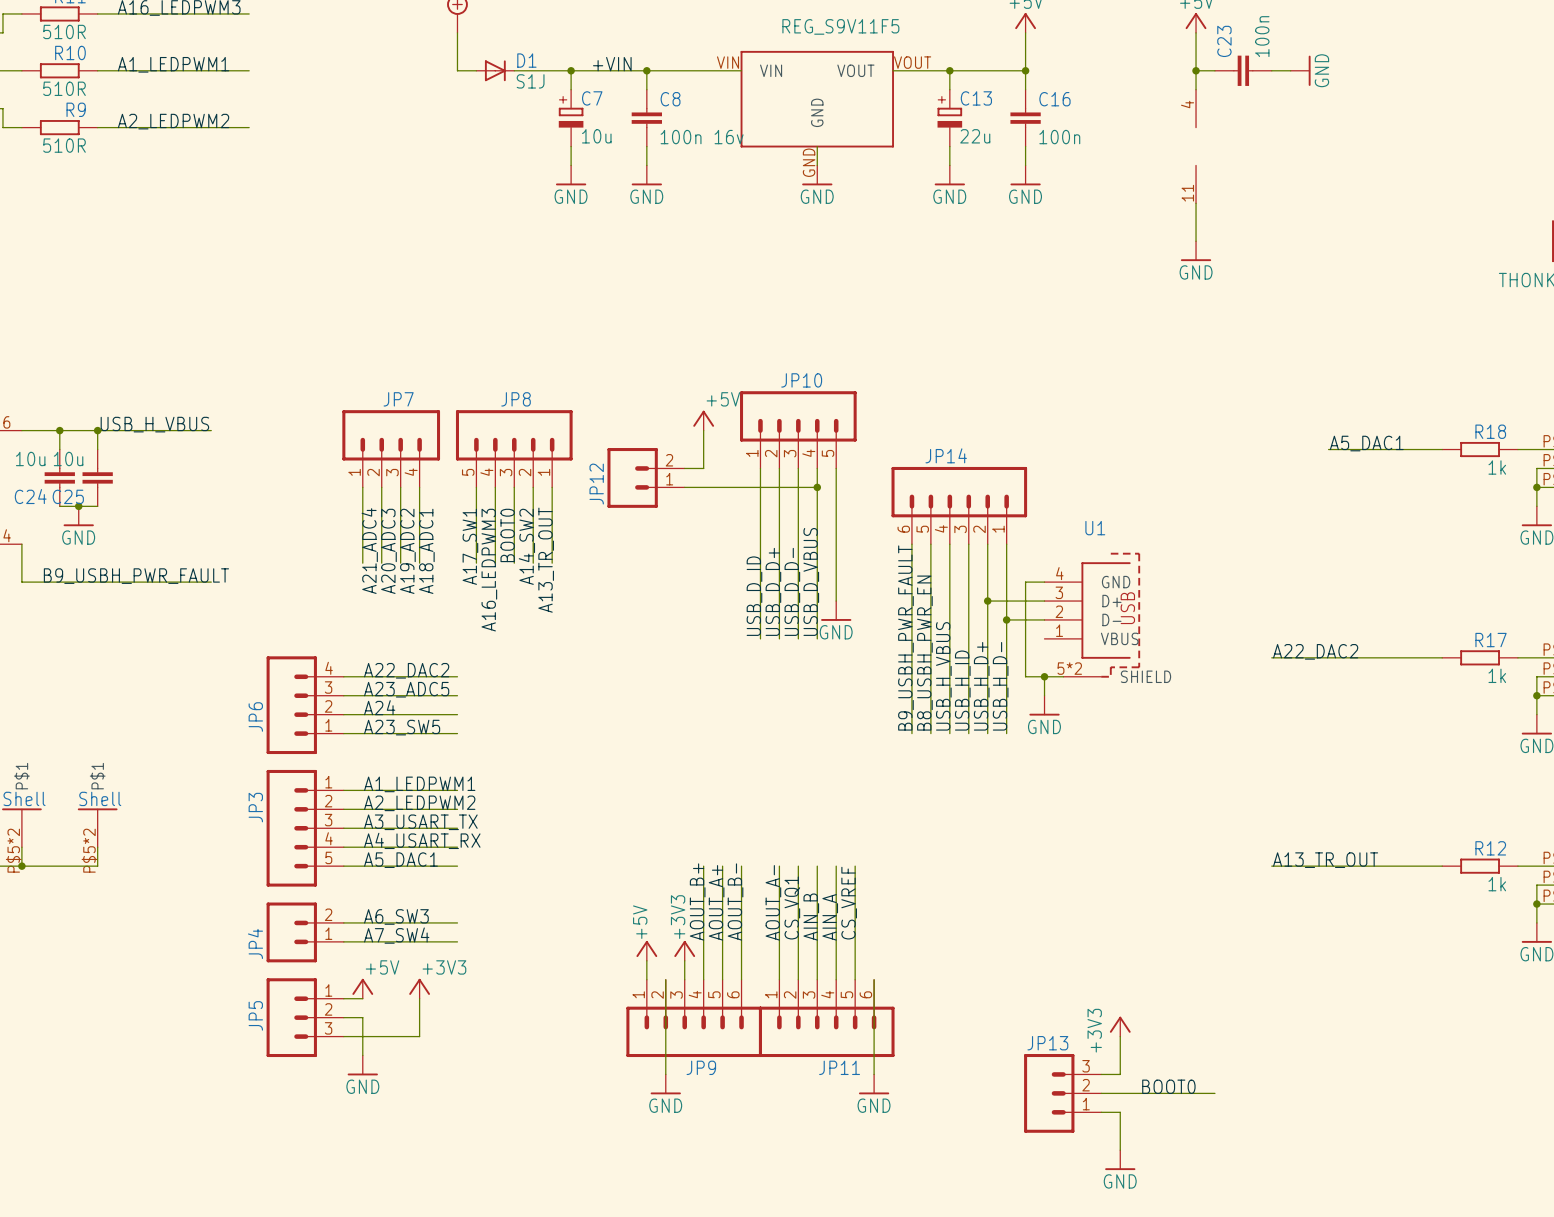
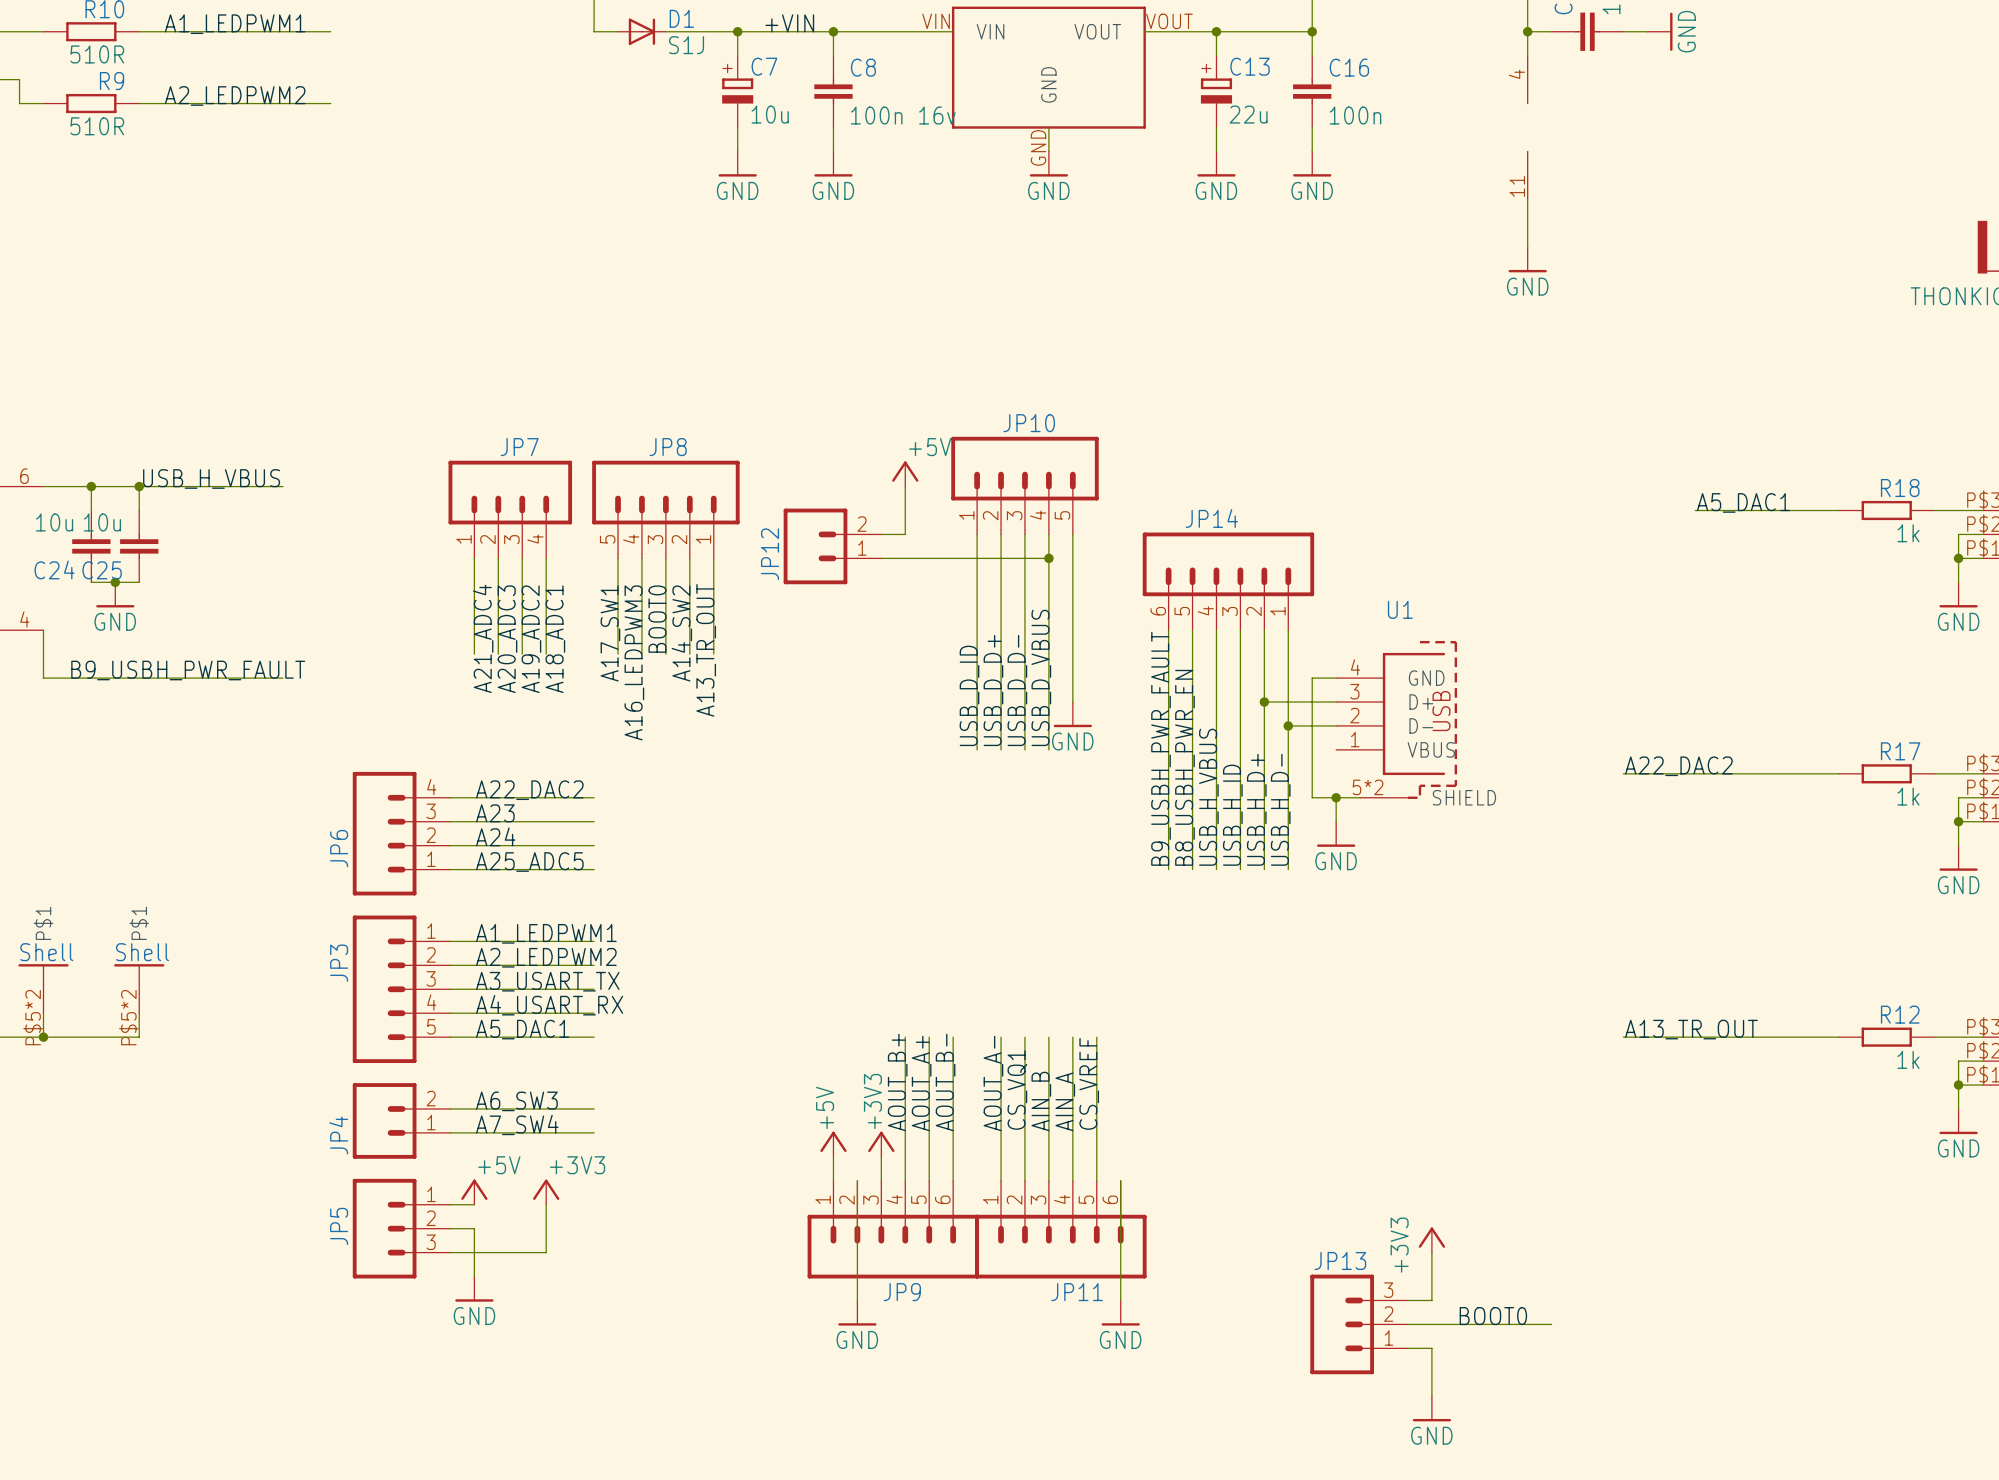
label: A23_ADC5 (406, 689) -> A23 (495, 813)
label: A23_SW5 (402, 727) -> A25_ADC5 (529, 862)

